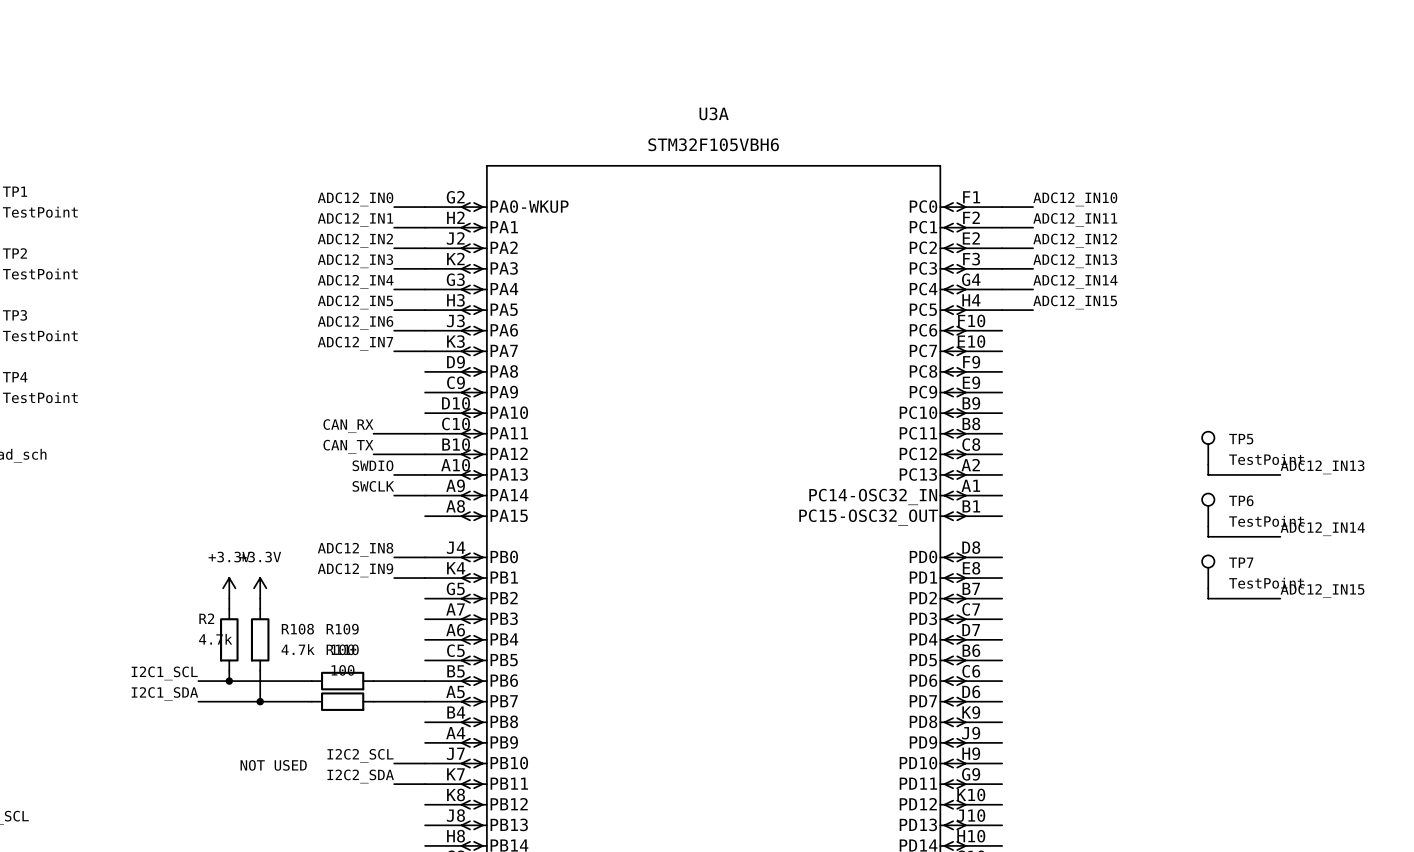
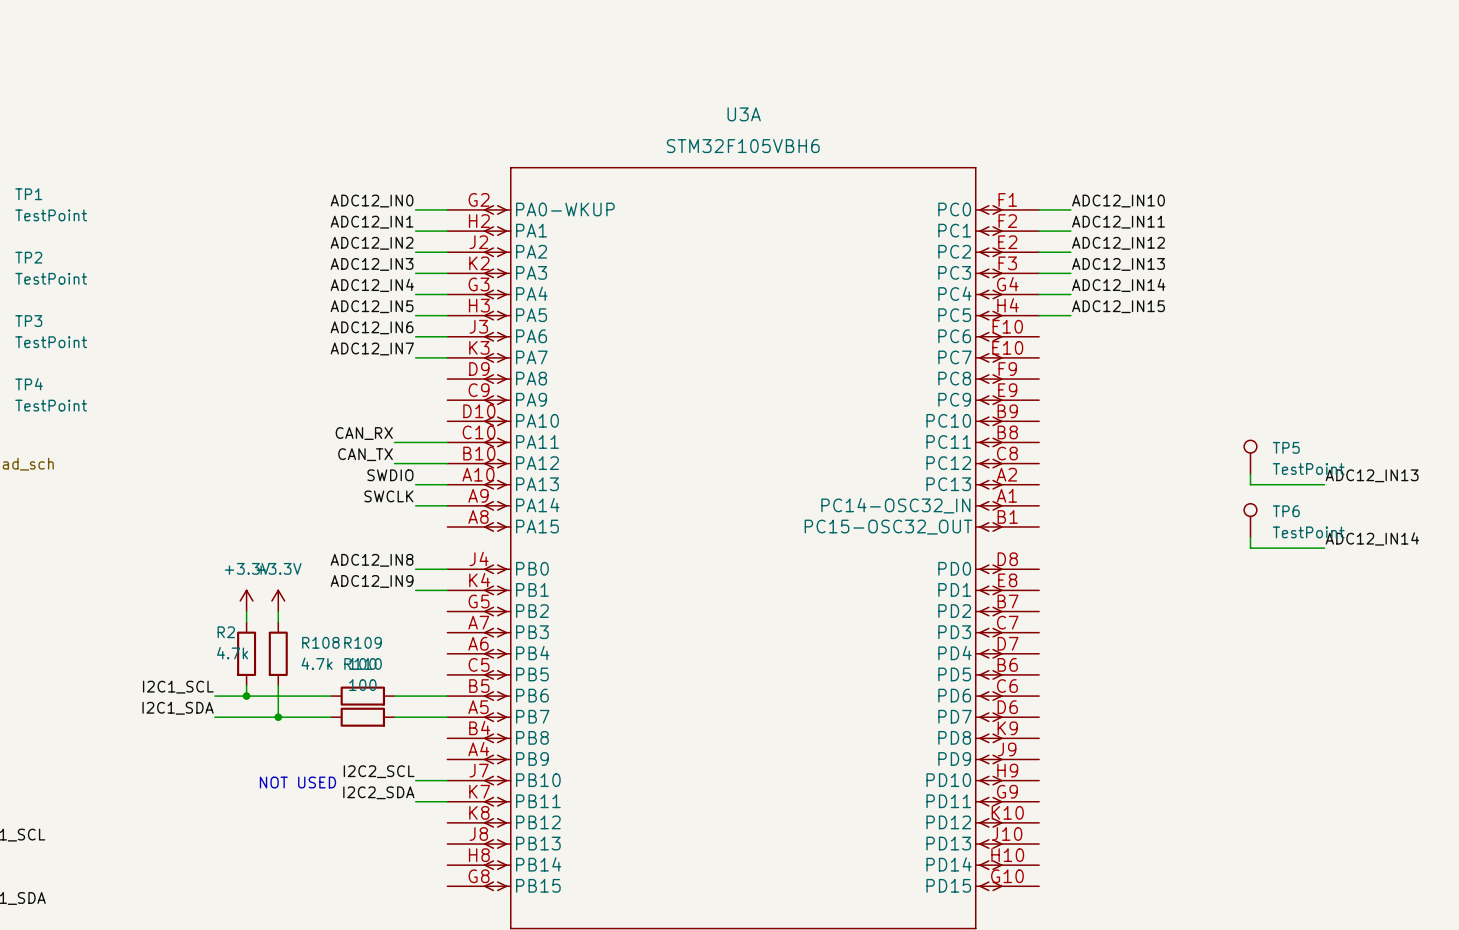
TP7: TestPoint (1208, 571) -> none
wire: (1208, 588) (1208, 598) (1280, 598) -> none
label: ADC12_IN15 (1322, 591) -> none

